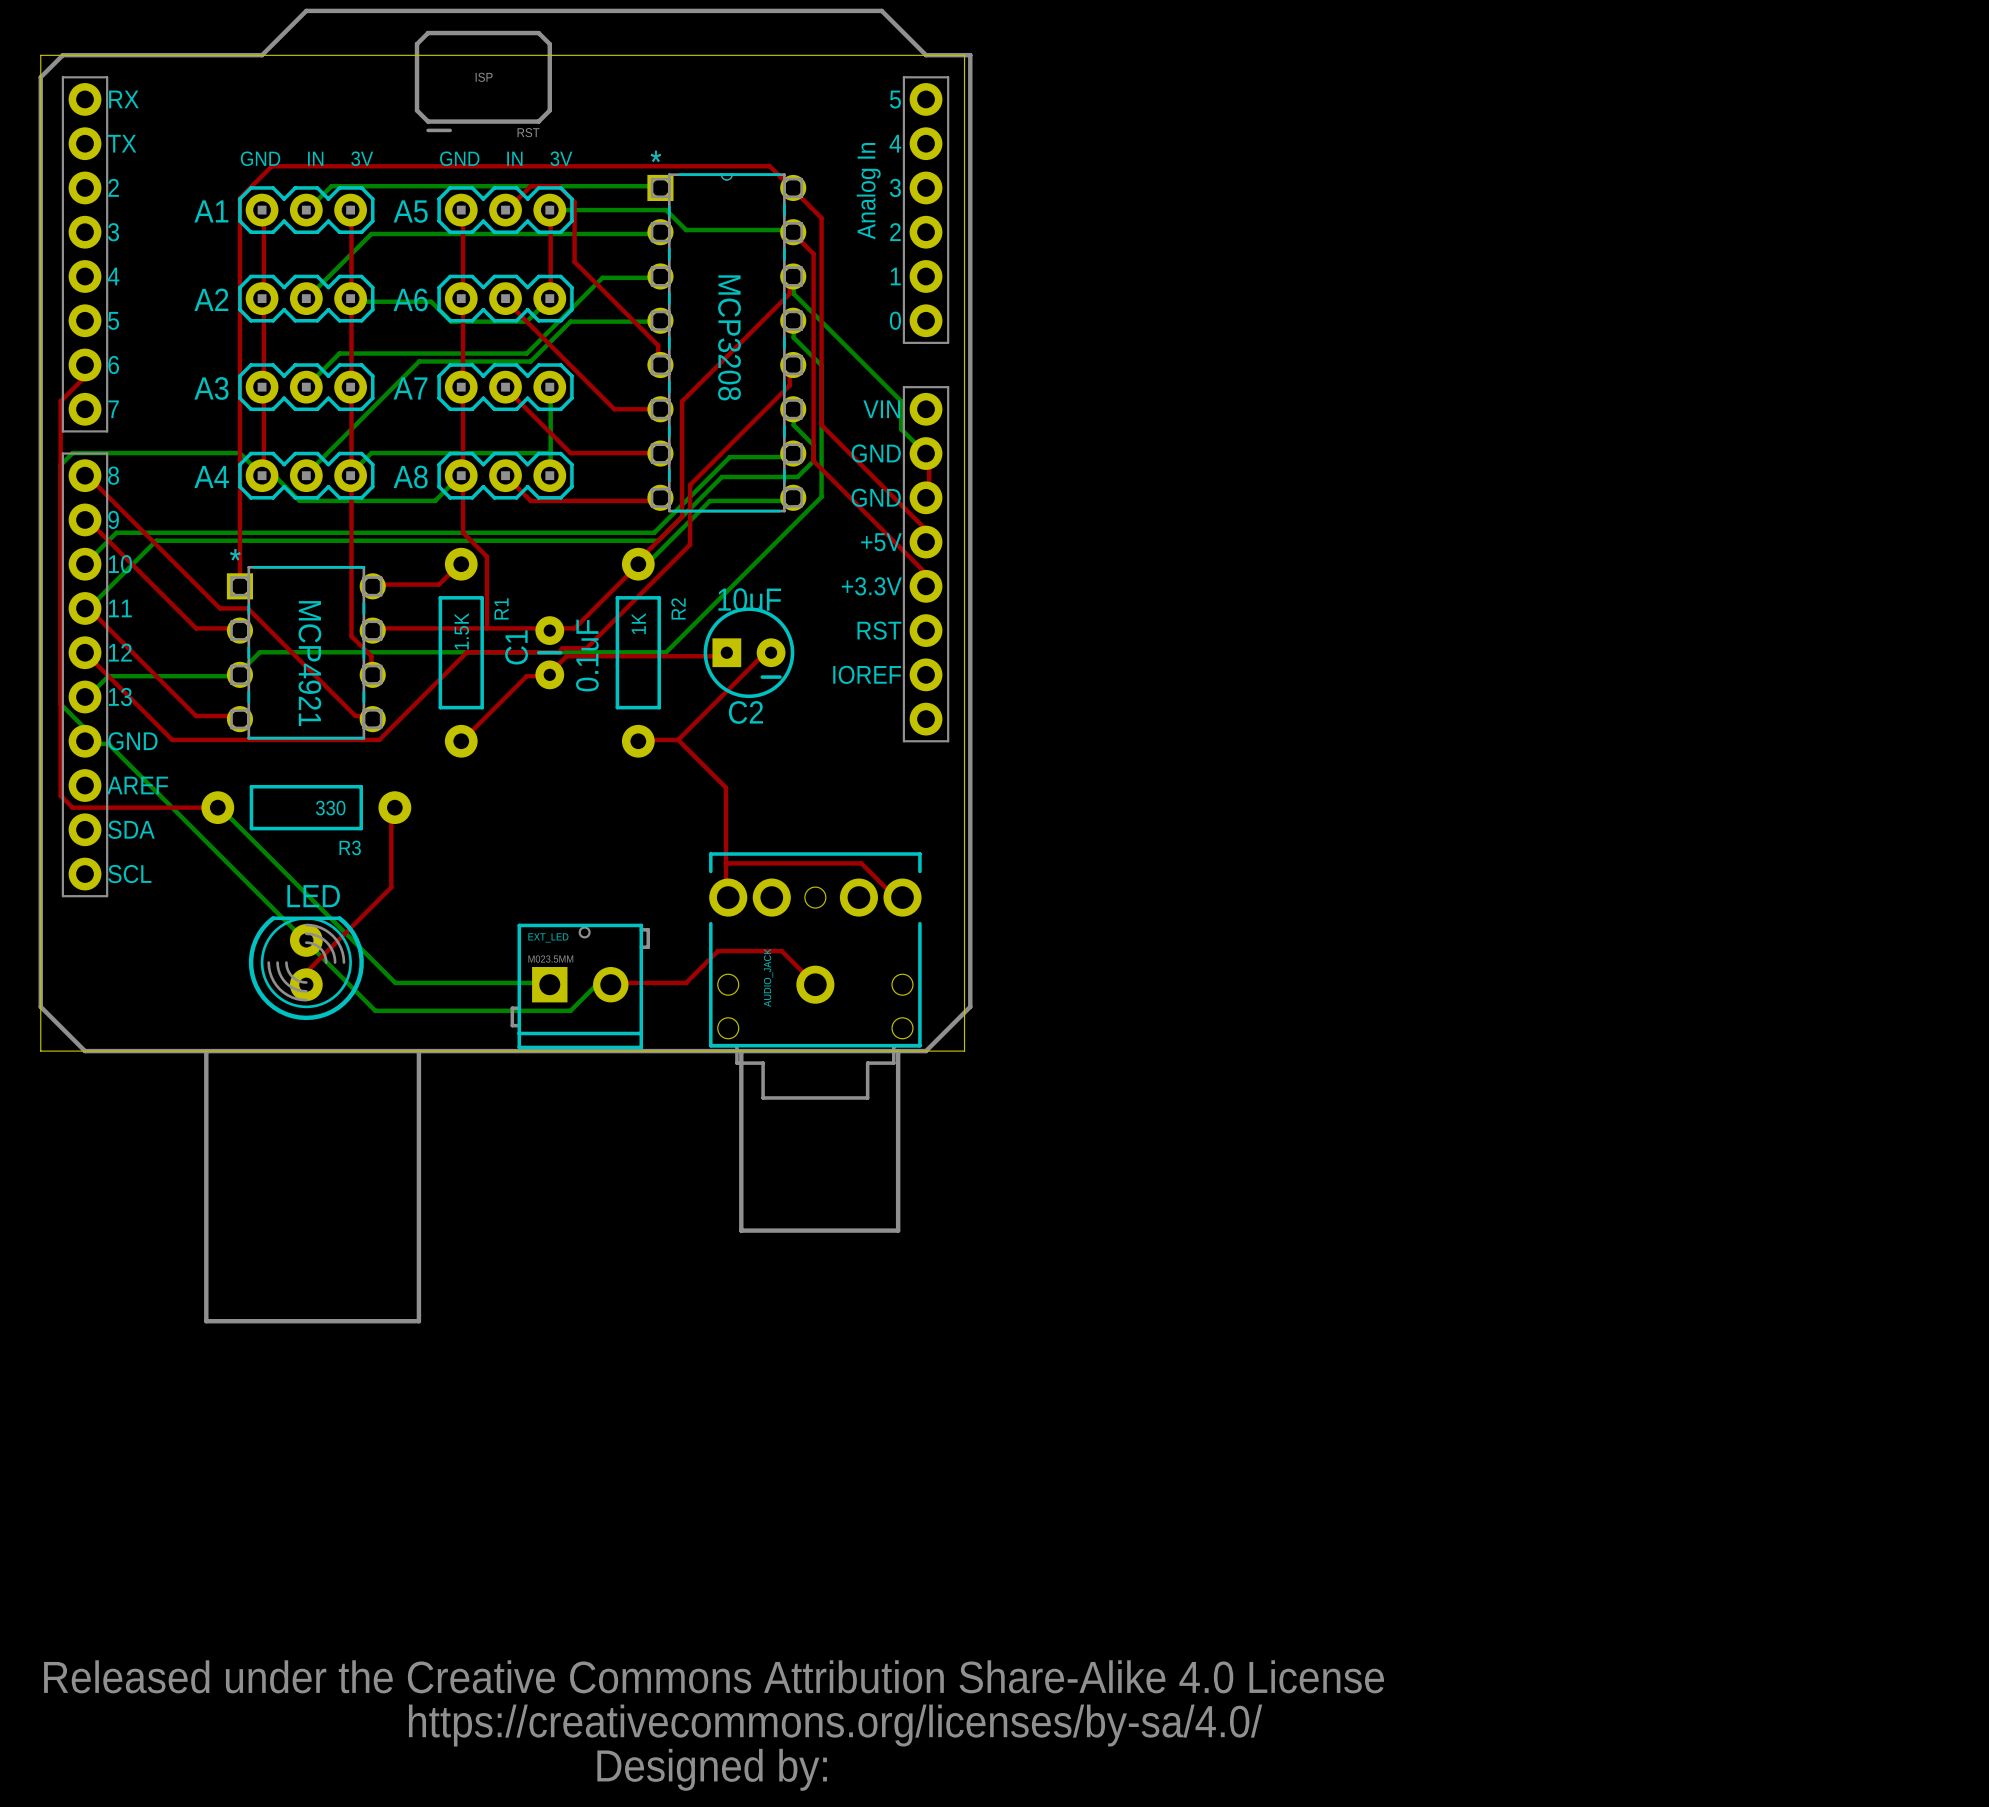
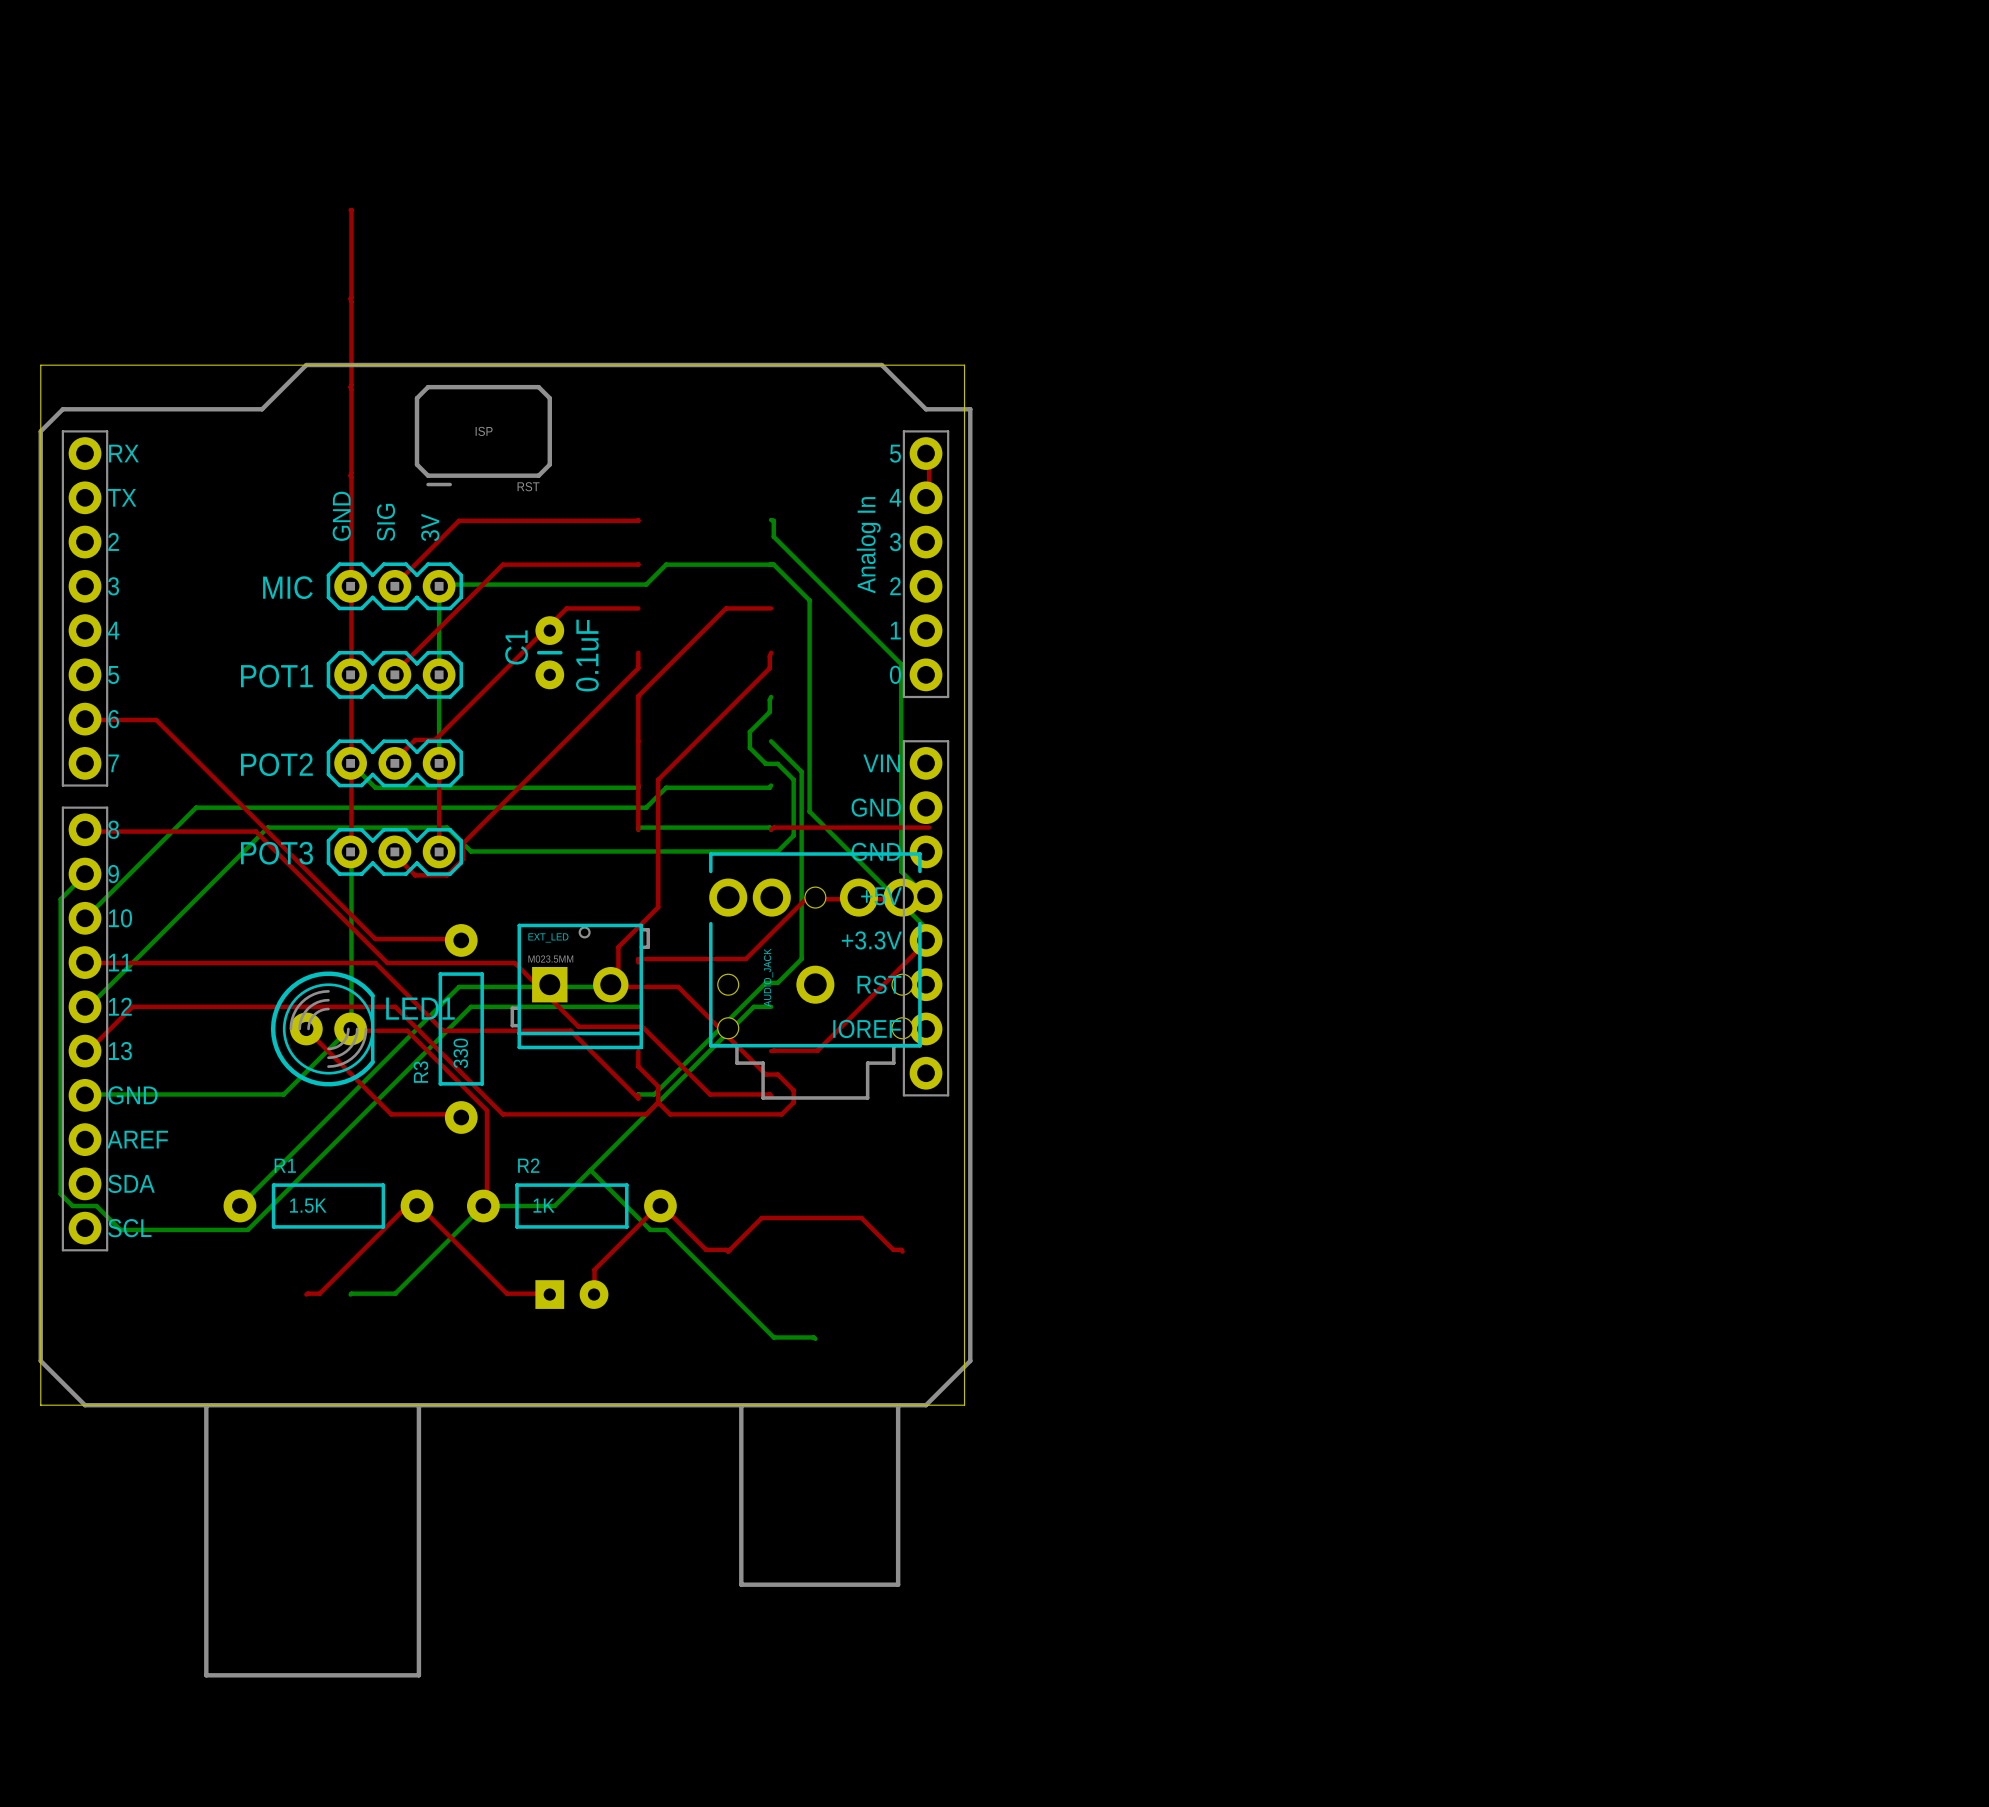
text: GND (260, 158) -> none
text: IN (315, 158) -> none
text: 3V (362, 158) -> none
text: GND (459, 158) -> none
text: IN (514, 158) -> none
text: 3V (561, 158) -> none
bottom track: (660, 187) (658, 186) (331, 186) (306, 210) -> none
top track: (262, 210) (263, 210) (263, 297) (262, 298) (263, 301) (263, 385) (262, 387) (263, 389) (263, 473) (262, 475) -> none
A1: (306, 210) -> none
top track: (461, 210) (463, 210) (463, 297) (461, 298) (463, 301) (463, 385) (461, 387) (463, 389) (463, 473) (461, 475) (463, 477) (463, 532) (486, 556) (486, 628) -> none
top track: (505, 210) (530, 186) (558, 186) (574, 202) (574, 261) (658, 345) (658, 361) (660, 365) -> none
A5: (505, 210) -> none
top track: (549, 210) (549, 298) -> none
bottom track: (549, 210) (666, 210) (686, 230) (789, 230) (793, 232) -> none
bottom track: (660, 232) (658, 233) (371, 233) (306, 298) -> none
top track: (793, 232) (813, 253) (813, 461) (925, 572) (926, 586) -> none
bottom track: (660, 276) (602, 277) (526, 353) (339, 353) (306, 387) -> none
top track: (793, 276) (789, 277) (789, 293) (682, 401) (682, 516) (638, 560) (638, 564) -> none
bottom track: (793, 276) (793, 293) (901, 401) (901, 429) (926, 453) -> none
A2: (306, 298) -> none
bottom track: (350, 298) (351, 301) (431, 301) (451, 321) (526, 321) (549, 298) -> none
top track: (505, 298) (614, 409) (660, 409) -> none
A6: (505, 298) -> none
bottom track: (660, 320) (570, 321) (530, 361) (419, 361) (306, 475) -> none
bottom track: (793, 320) (793, 337) (821, 365) (821, 496) (666, 652) (259, 652) (239, 672) (239, 676) (108, 676) (88, 696) (85, 696) -> none
MCP3208: (726, 342) -> none
board edge: (40, 365) (40, 55) (964, 55) (964, 365) -> (40, 365) (964, 365)
top track: (85, 365) (84, 377) (60, 401) (60, 795) (72, 807) (217, 807) -> none
top track: (793, 365) (789, 365) (789, 385) (690, 484) (690, 544) (586, 648) (562, 648) (558, 652) (467, 652) (379, 739) (172, 739) (85, 652) -> none
A3: (306, 387) -> none
top track: (505, 387) (570, 453) (660, 453) -> none
A7: (505, 387) -> none
bottom track: (549, 387) (549, 475) -> none
bottom track: (793, 409) (793, 425) (813, 445) (813, 461) (797, 477) (721, 477) (658, 540) (156, 540) (88, 608) (85, 608) -> none
bottom track: (550, 453) (371, 453) (350, 475) -> none
bottom track: (793, 453) (789, 457) (729, 457) (654, 532) (116, 532) (85, 564) -> none
top track: (85, 475) (88, 477) (220, 608) (247, 608) (355, 716) (371, 716) (372, 719) -> none
A4: (306, 475) -> none
bottom track: (461, 475) (435, 500) (299, 500) (275, 477) (262, 475) (239, 453) (72, 453) (60, 465) (60, 704) (84, 727) (85, 741) (88, 743) (108, 743) (375, 1010) (570, 1010) (594, 986) -> (239, 1206) (459, 986) (594, 986)
top track: (505, 475) (530, 500) (658, 500) (660, 497) -> none
A8: (505, 475) -> none
bottom track: (793, 497) (789, 500) (710, 500) (650, 560) (638, 560) (638, 564) -> none
text: none -> GND (341, 516)
top track: (85, 519) (88, 520) (196, 628) (239, 628) (239, 630) -> none
top track: none -> (638, 519) (459, 520) (394, 586)
bottom track: none -> (771, 519) (773, 520) (773, 536) (901, 664) (901, 871) (926, 896)
text: none -> SIG (386, 522)
text: none -> 3V (430, 527)
top track: (926, 542) (925, 528) (821, 425) (821, 218) (769, 166) (271, 166) (239, 198) (239, 586) -> none
top track: (461, 564) (439, 584) (375, 584) (372, 586) -> none
top track: (638, 564) (574, 628) (550, 628) (549, 630) (546, 628) (375, 628) (372, 630) -> (638, 564) (502, 564) (395, 672) (394, 674)
MIC: none -> (394, 586)
top track: (85, 608) (88, 608) (196, 716) (239, 716) (239, 719) -> none
R1 name position: R1 (501, 608) -> R1 (285, 1165)
top track: none -> (638, 608) (566, 608) (435, 739) (415, 739) (395, 759) (394, 763)
R2 name position: R2 (678, 608) -> R2 (528, 1165)
R2 value position: 1K (638, 623) -> 1K (544, 1205)
top track: (351, 636) (371, 656) (372, 674) -> (351, 636) (350, 851)
MCP4921: (306, 652) -> none
R1 rotation: 0° (461, 652) -> 90° clockwise (328, 1206)
R1 position: (461, 652) -> (328, 1206)
top track: none -> (638, 652) (638, 668) (463, 843) (463, 859) (447, 875) (415, 875) (395, 855) (394, 851)
R2 rotation: 0° (638, 652) -> 90° clockwise (571, 1206)
R2 position: (638, 652) -> (571, 1206)
top track: (726, 652) (725, 656) (566, 656) (549, 674) (526, 676) (461, 741) -> none
C2: 10uF (748, 652) -> none
top track: (769, 656) (761, 656) (678, 739) -> (769, 656) (769, 668) (658, 779) (658, 907) (618, 947) (618, 978) (626, 986) (678, 986) (765, 1074) (777, 1074) (793, 1090) (793, 1102) (781, 1114) (670, 1114) (658, 1102)
part position: (505, 666) -> (505, 1020)
POT1: none -> (394, 674)
bottom track: none -> (771, 696) (769, 712) (749, 731) (749, 747) (765, 763) (777, 763) (793, 779) (793, 835) (777, 851) (470, 851) (447, 827) (267, 827) (88, 1006) (85, 1006)
top track: none -> (85, 719) (156, 720) (375, 939) (461, 940)
top track: (638, 739) (678, 739) -> (638, 739) (638, 696) (725, 608) (771, 608)
top track: (678, 739) (725, 787) (725, 895) (728, 897) -> none
top track: none -> (638, 741) (638, 829)
bottom track: none -> (771, 741) (801, 771) (801, 959) (777, 982) (765, 982) (654, 1094) (638, 1095)
bottom track: none -> (350, 763) (375, 787) (638, 787) (638, 785)
POT2: none -> (394, 763)
top track: none -> (439, 763) (439, 851)
bottom track: none -> (439, 763) (439, 584) (646, 584) (666, 564) (773, 564) (809, 600) (809, 811) (925, 927) (926, 940)
bottom track: none -> (217, 807) (196, 807) (85, 918)
bottom track: (220, 807) (395, 982) (546, 982) (549, 984) -> (220, 807) (646, 807) (666, 787) (769, 787) (771, 785)
R3 rotation: 0° (306, 807) -> 90° clockwise (461, 1028)
R3 position: (306, 807) -> (461, 1028)
top track: (394, 807) (391, 807) (391, 887) (307, 970) (306, 984) -> none
top track: none -> (929, 827) (773, 827) (771, 829)
top track: none -> (85, 829) (88, 831) (255, 831) (387, 963) (514, 963) (578, 1026) (642, 1026) (710, 1094) (771, 1095)
bottom track: none -> (638, 829) (638, 827) (769, 827) (771, 829)
bottom track: none -> (350, 851) (351, 1026) (283, 1094) (85, 1095)
POT3: none -> (394, 851)
top track: (725, 863) (861, 863) (893, 895) (901, 895) (902, 897) -> none
bottom track: none -> (85, 874) (60, 899) (60, 1194) (72, 1206) (96, 1206) (120, 1229) (247, 1229) (470, 1006) (638, 1006)
top track: none -> (926, 896) (925, 899) (805, 899) (745, 959) (638, 959) (638, 962)
top track: none -> (926, 940) (817, 1050) (771, 1051)
top track: none -> (85, 962) (375, 963) (443, 1030) (570, 1030) (638, 1098) (638, 1095)
LED: (306, 968) -> none
top track: (610, 984) (614, 982) (686, 982) (717, 951) (781, 951) (815, 984) -> none
bottom track: none -> (771, 1006) (753, 1006) (554, 1206) (482, 1206) (395, 1293) (350, 1294)
top track: none -> (306, 1028) (391, 1114) (459, 1114) (461, 1117)
LED1: none -> (322, 1028)
top track: none -> (350, 1028) (351, 1030) (407, 1030) (486, 1110) (486, 1206) (483, 1206)
board edge: (40, 1051) (964, 1051) -> (40, 1051) (40, 1405) (964, 1405) (964, 1051)
top track: none -> (85, 1051) (88, 1050) (132, 1006) (395, 1006) (502, 1114) (646, 1114) (658, 1102)
top track: none -> (638, 1051) (638, 1066) (658, 1086) (658, 1102)
bottom track: none -> (590, 1170) (650, 1229) (666, 1229) (773, 1337) (815, 1338)
top track: none -> (902, 1251) (901, 1249) (893, 1249) (861, 1217) (761, 1217) (728, 1251) (725, 1249) (706, 1249) (662, 1206) (658, 1206) (594, 1269) (594, 1294)
top track: none -> (306, 1294) (319, 1293) (407, 1206) (419, 1206) (506, 1293) (549, 1294)
part: none -> (571, 1294)
drawing: [44, 1660, 1385, 1791] -> none

